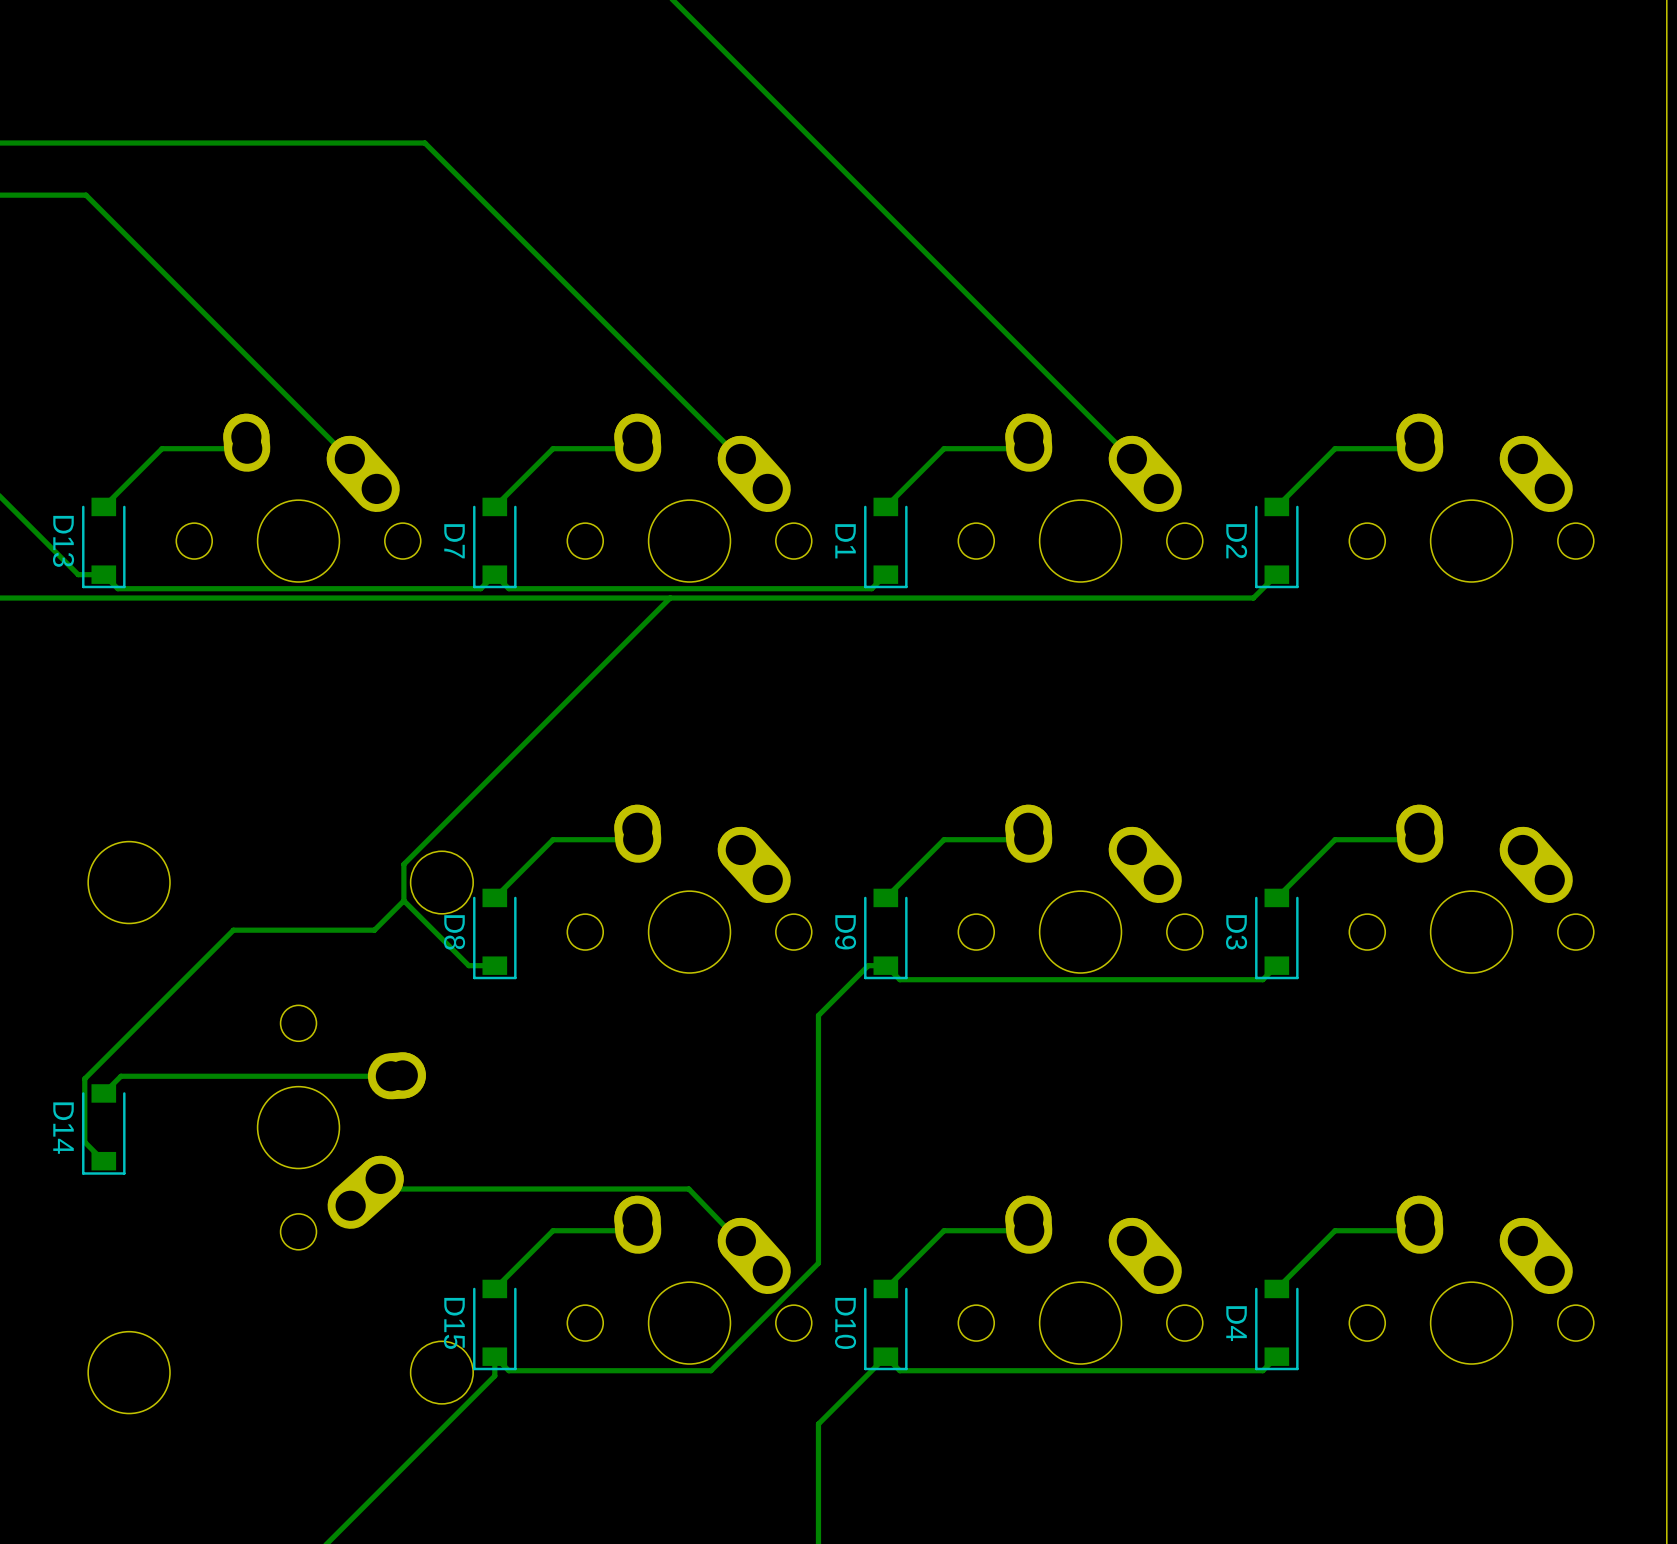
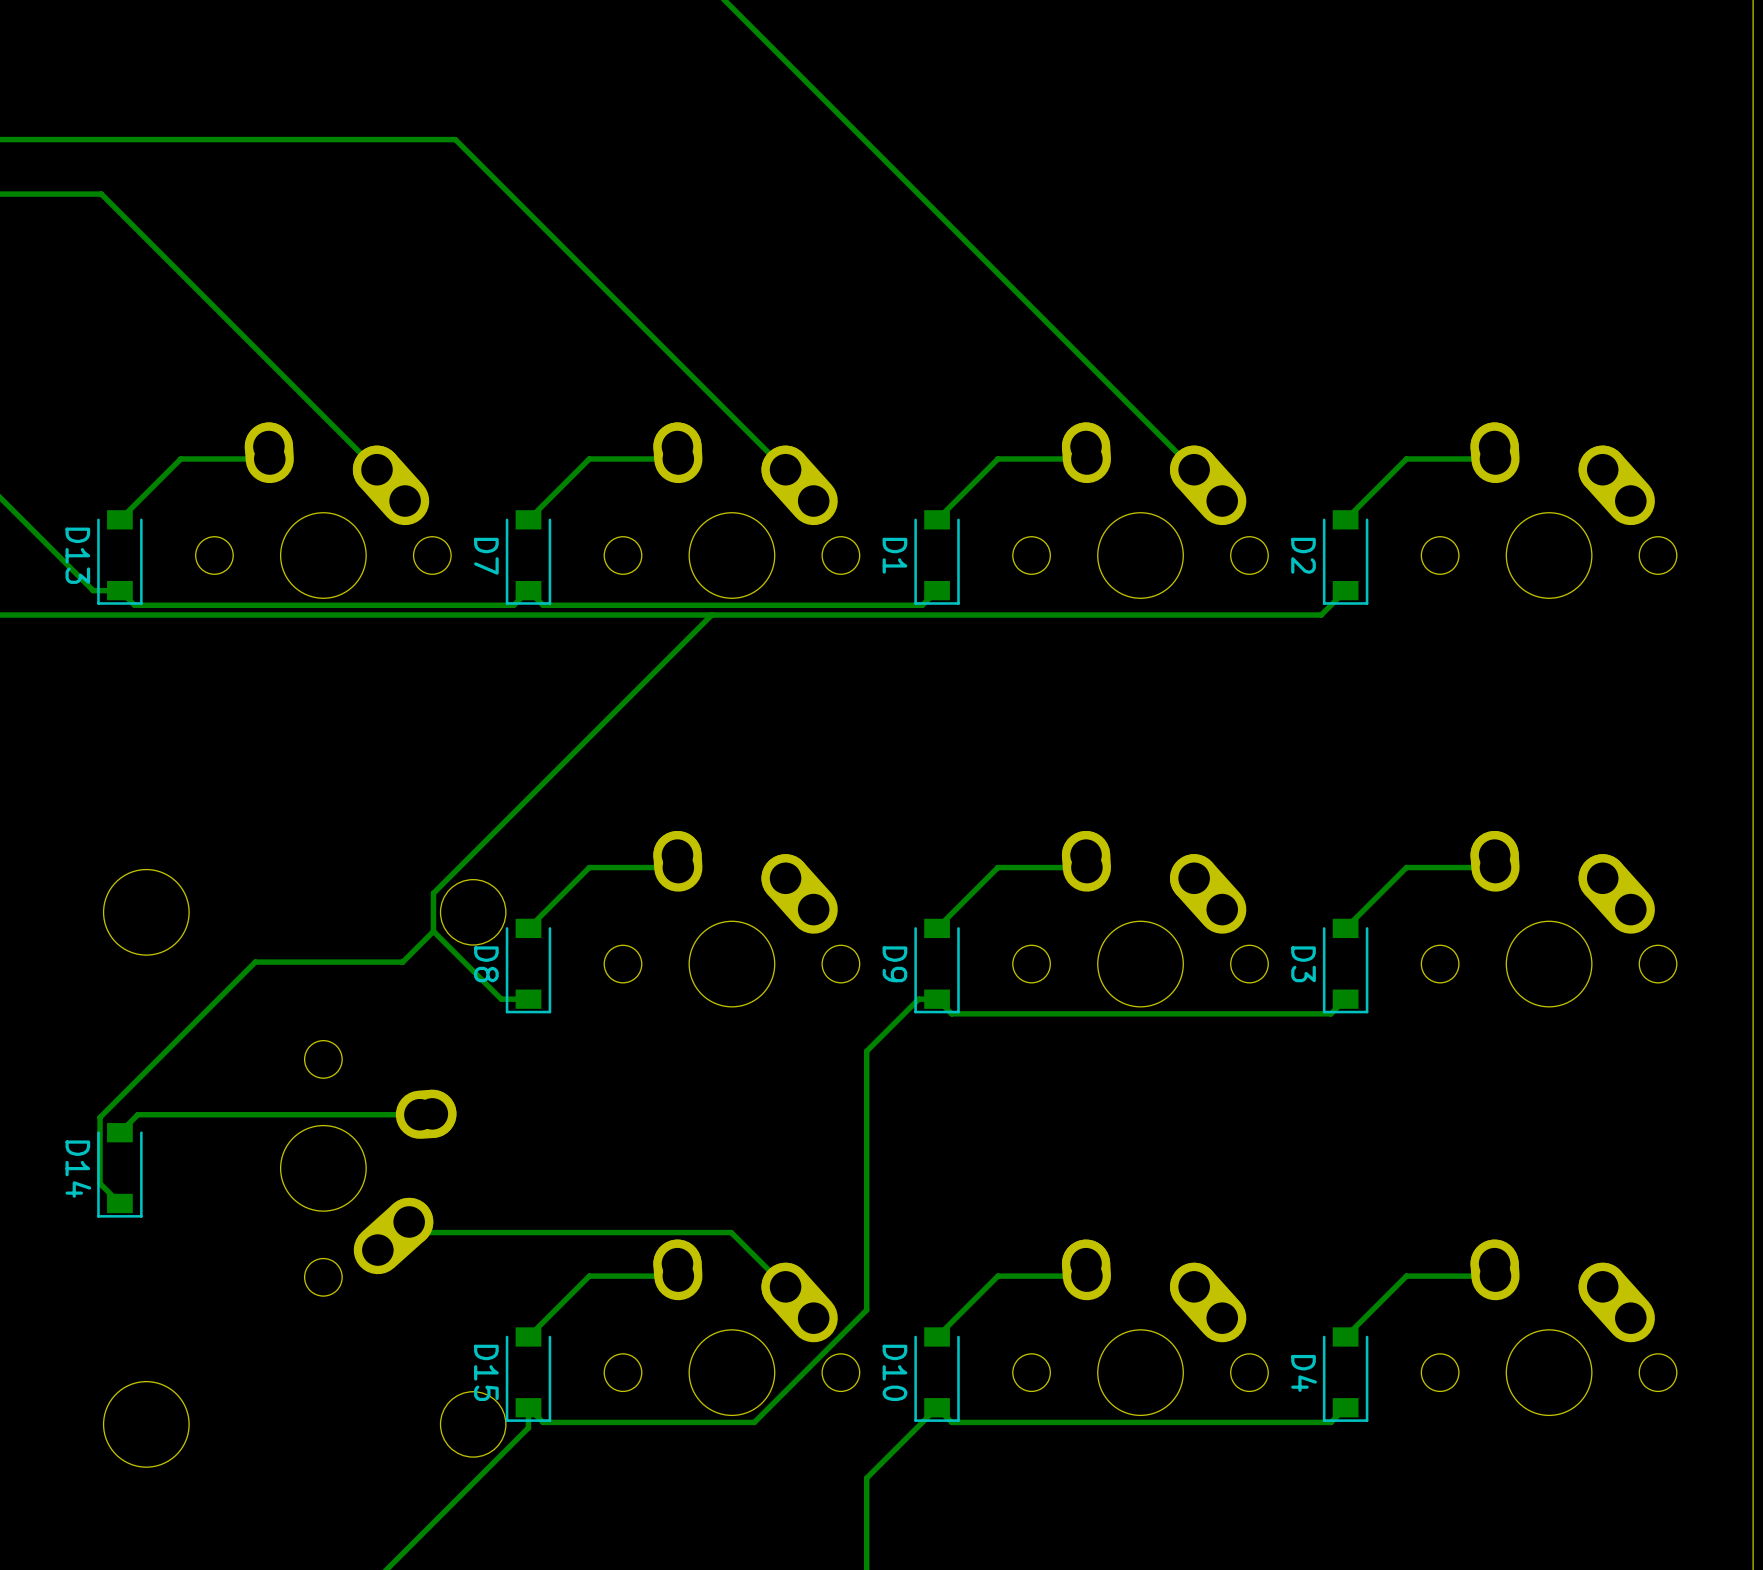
track: (688, 1189) (767, 1270) -> (731, 1232) (785, 1286)

